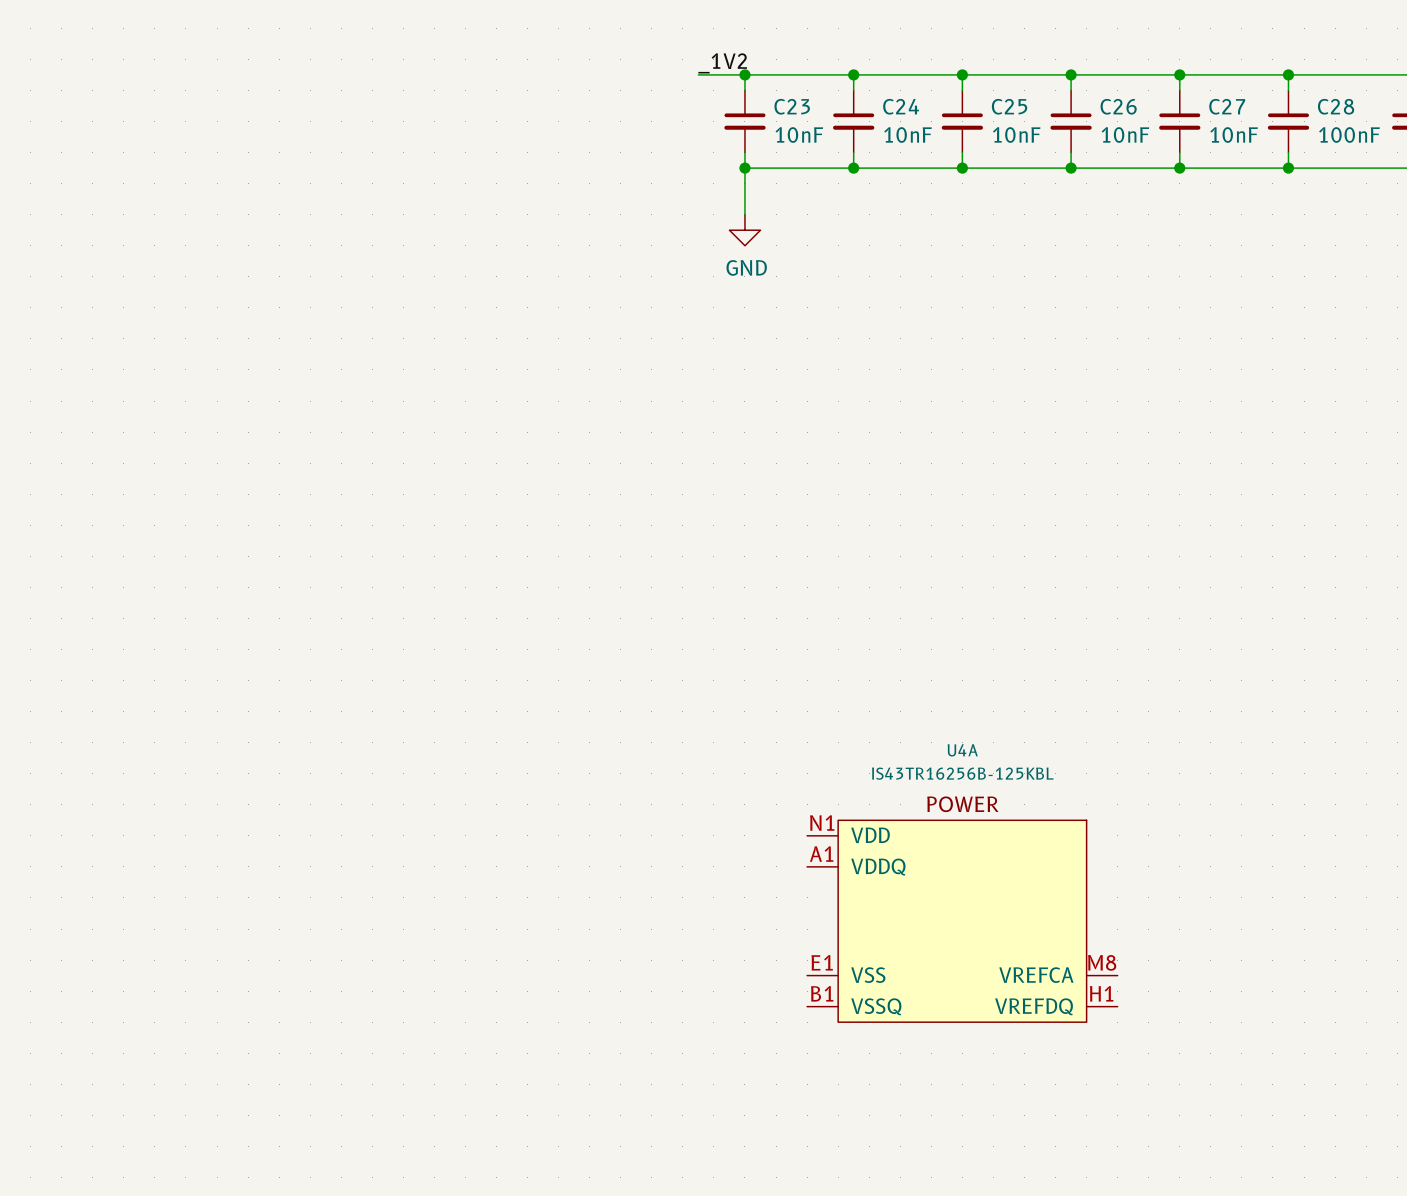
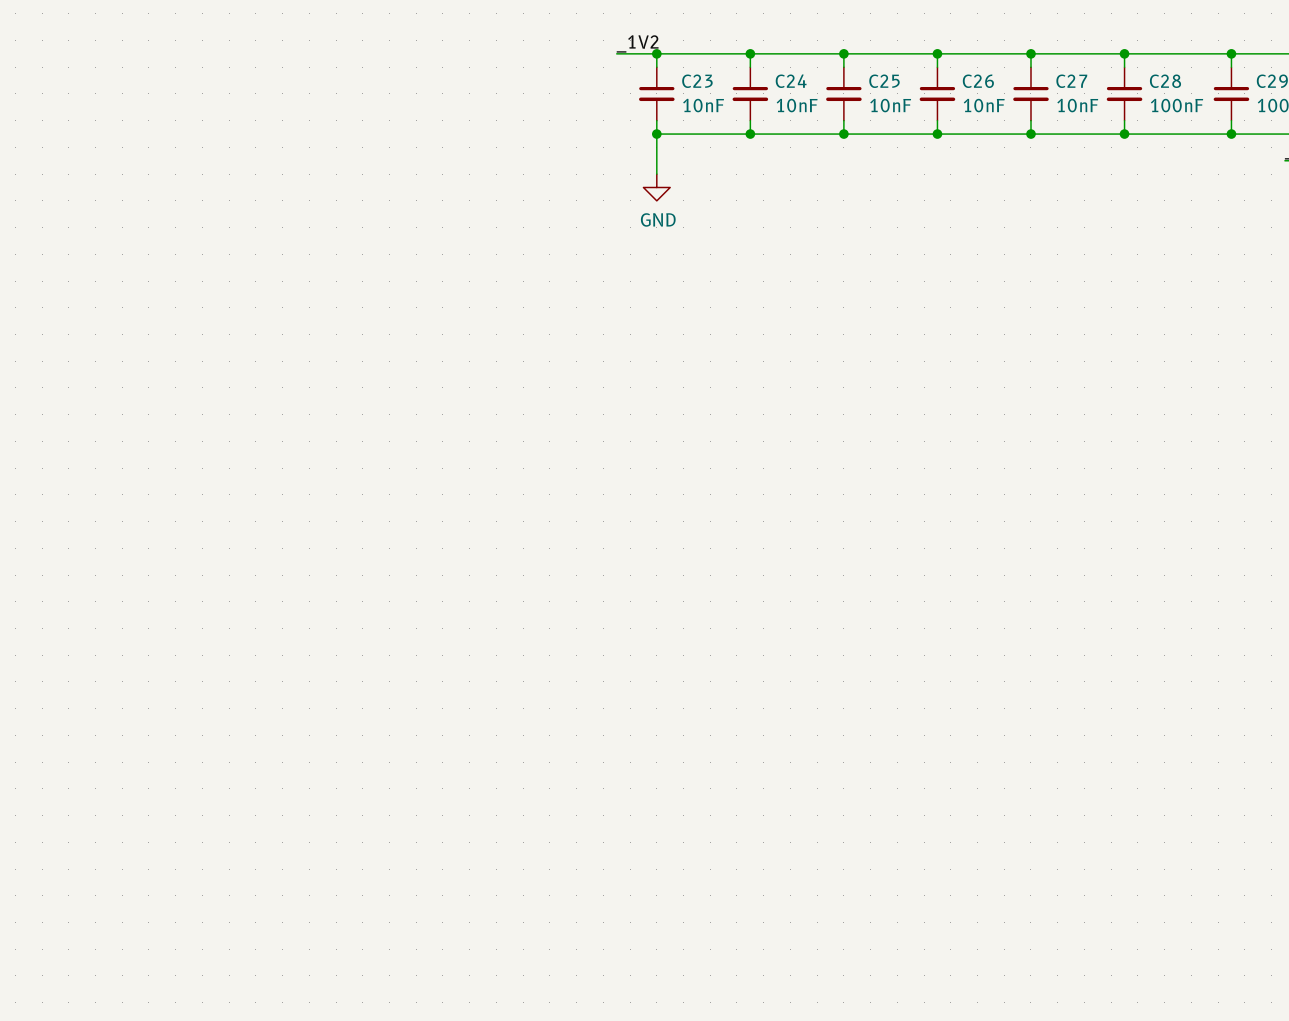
U4A: IS43TR16256B-125KBL (962, 921) -> none

